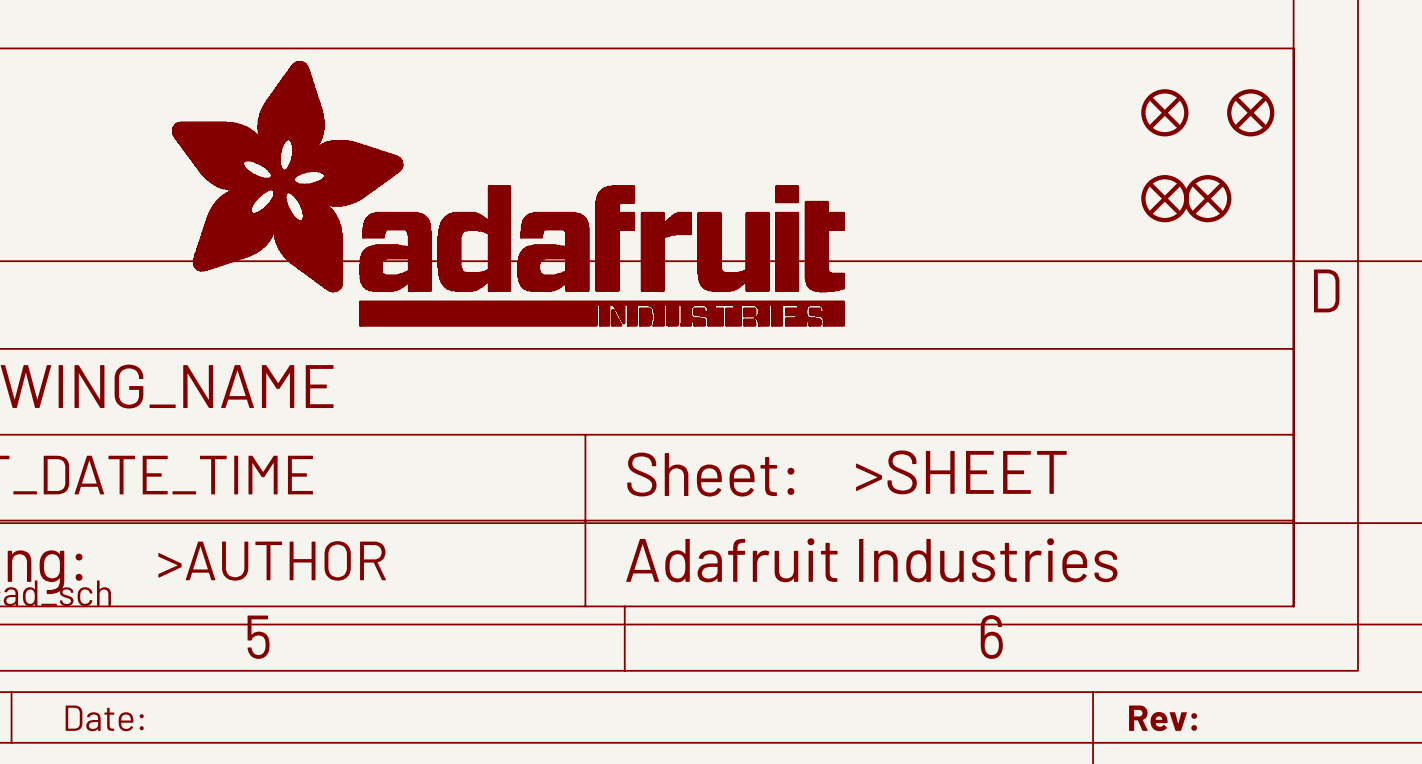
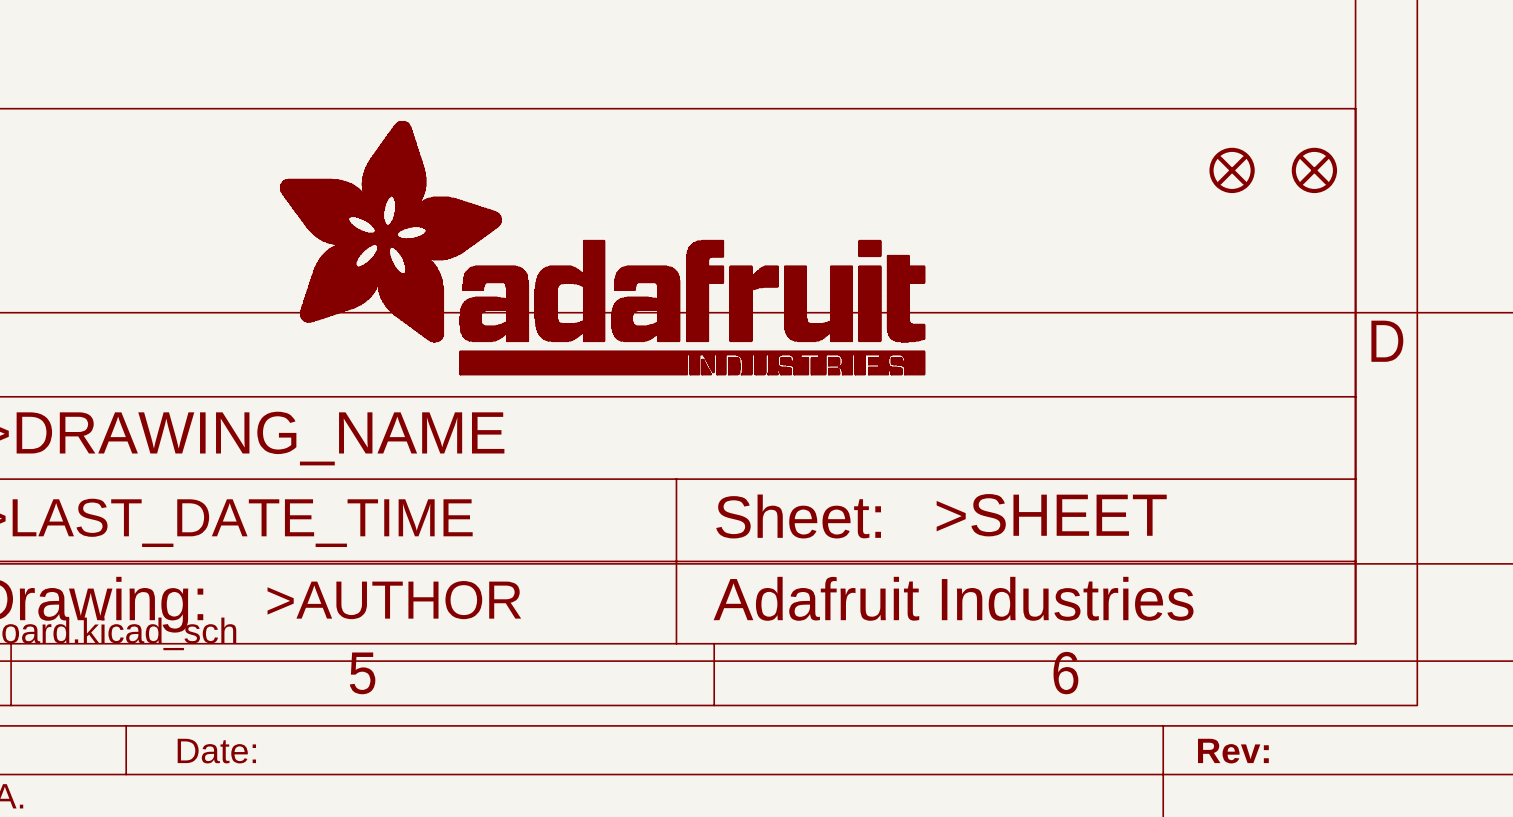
part: (1164, 198) -> none
part: (1207, 198) -> none

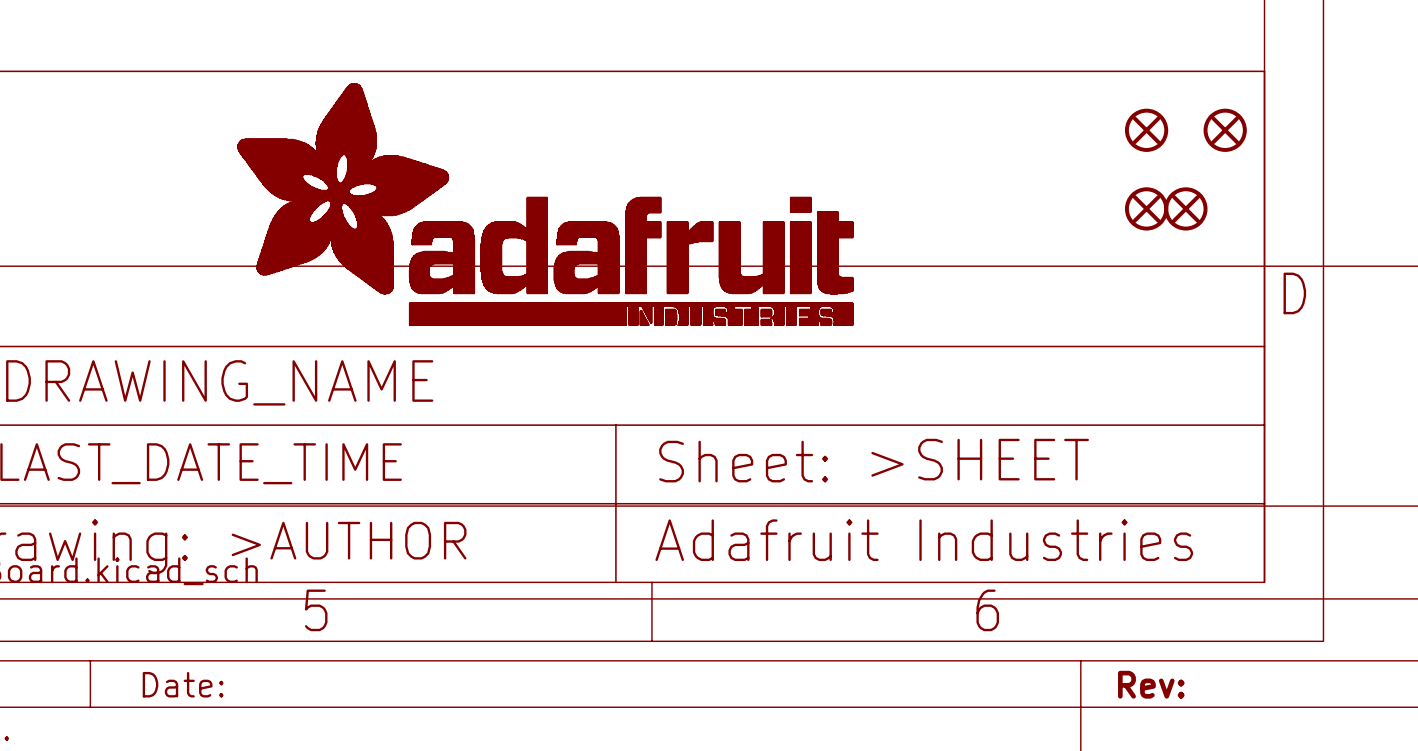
part: none -> (1146, 208)
part: none -> (1185, 208)

